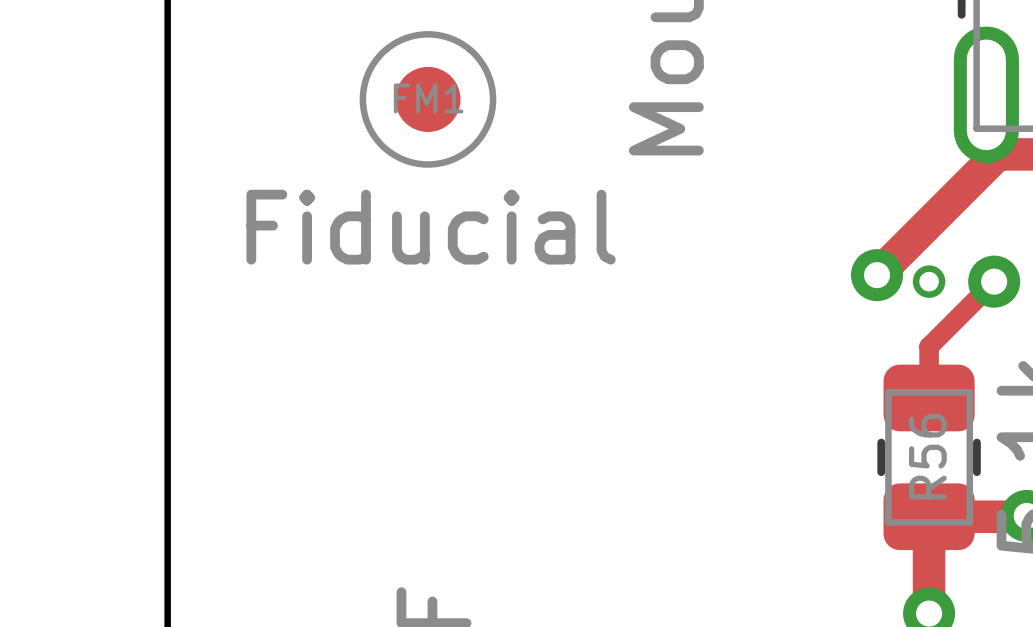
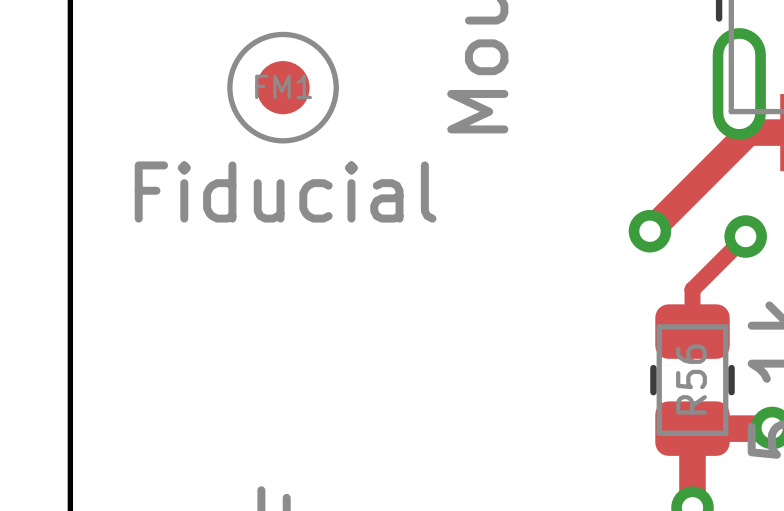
via: (929, 281) -> none

